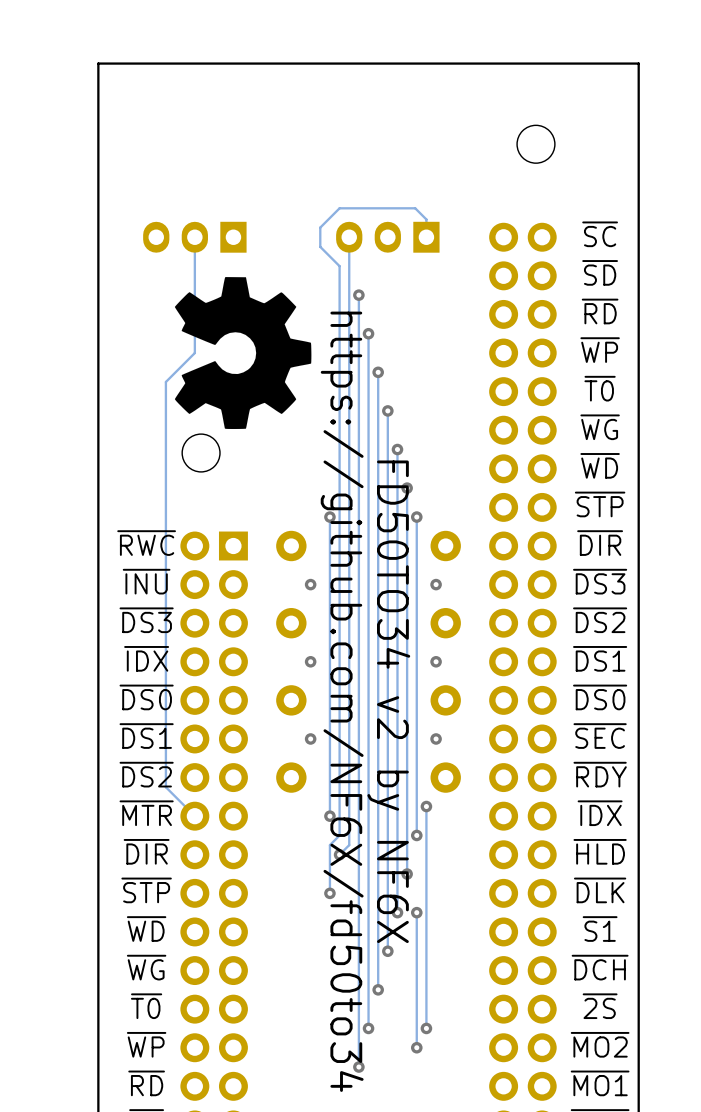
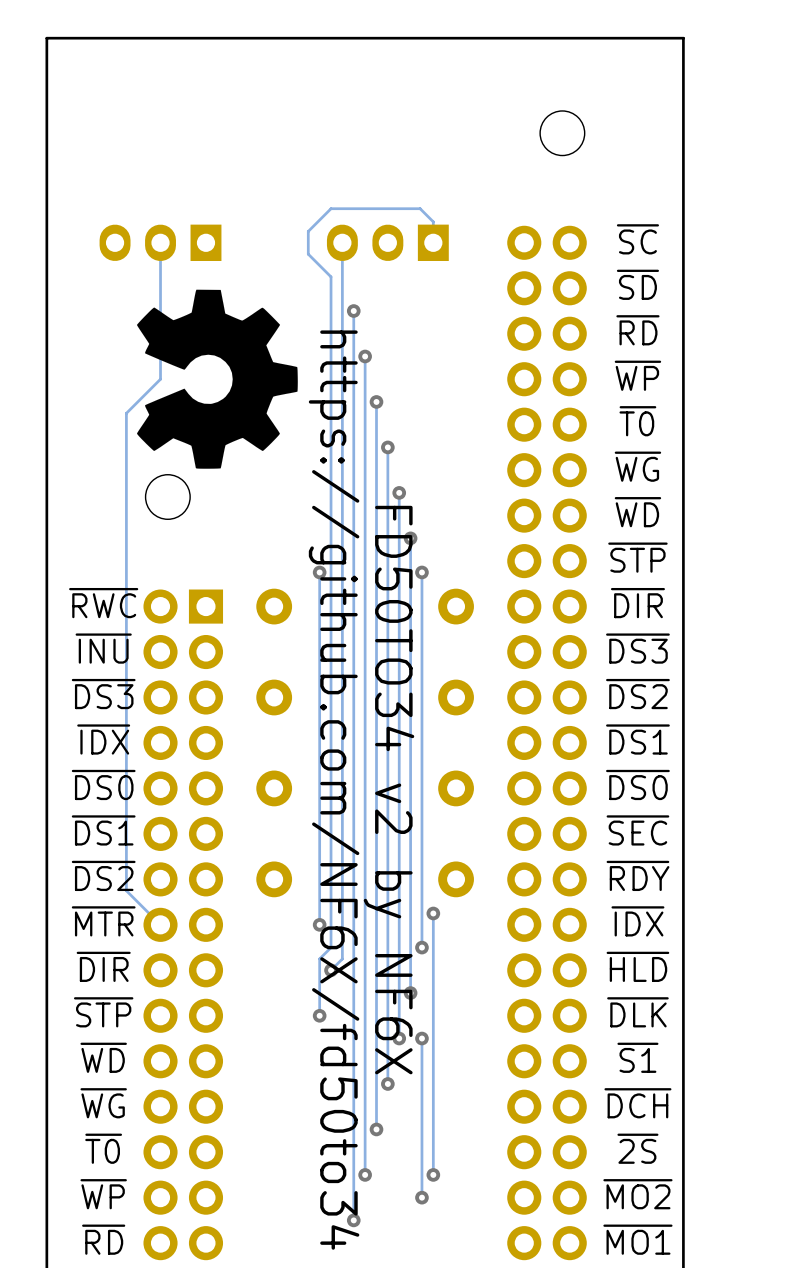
via: (310, 584) -> none
via: (436, 584) -> none
via: (310, 661) -> none
via: (436, 661) -> none
via: (310, 738) -> none
via: (436, 738) -> none

